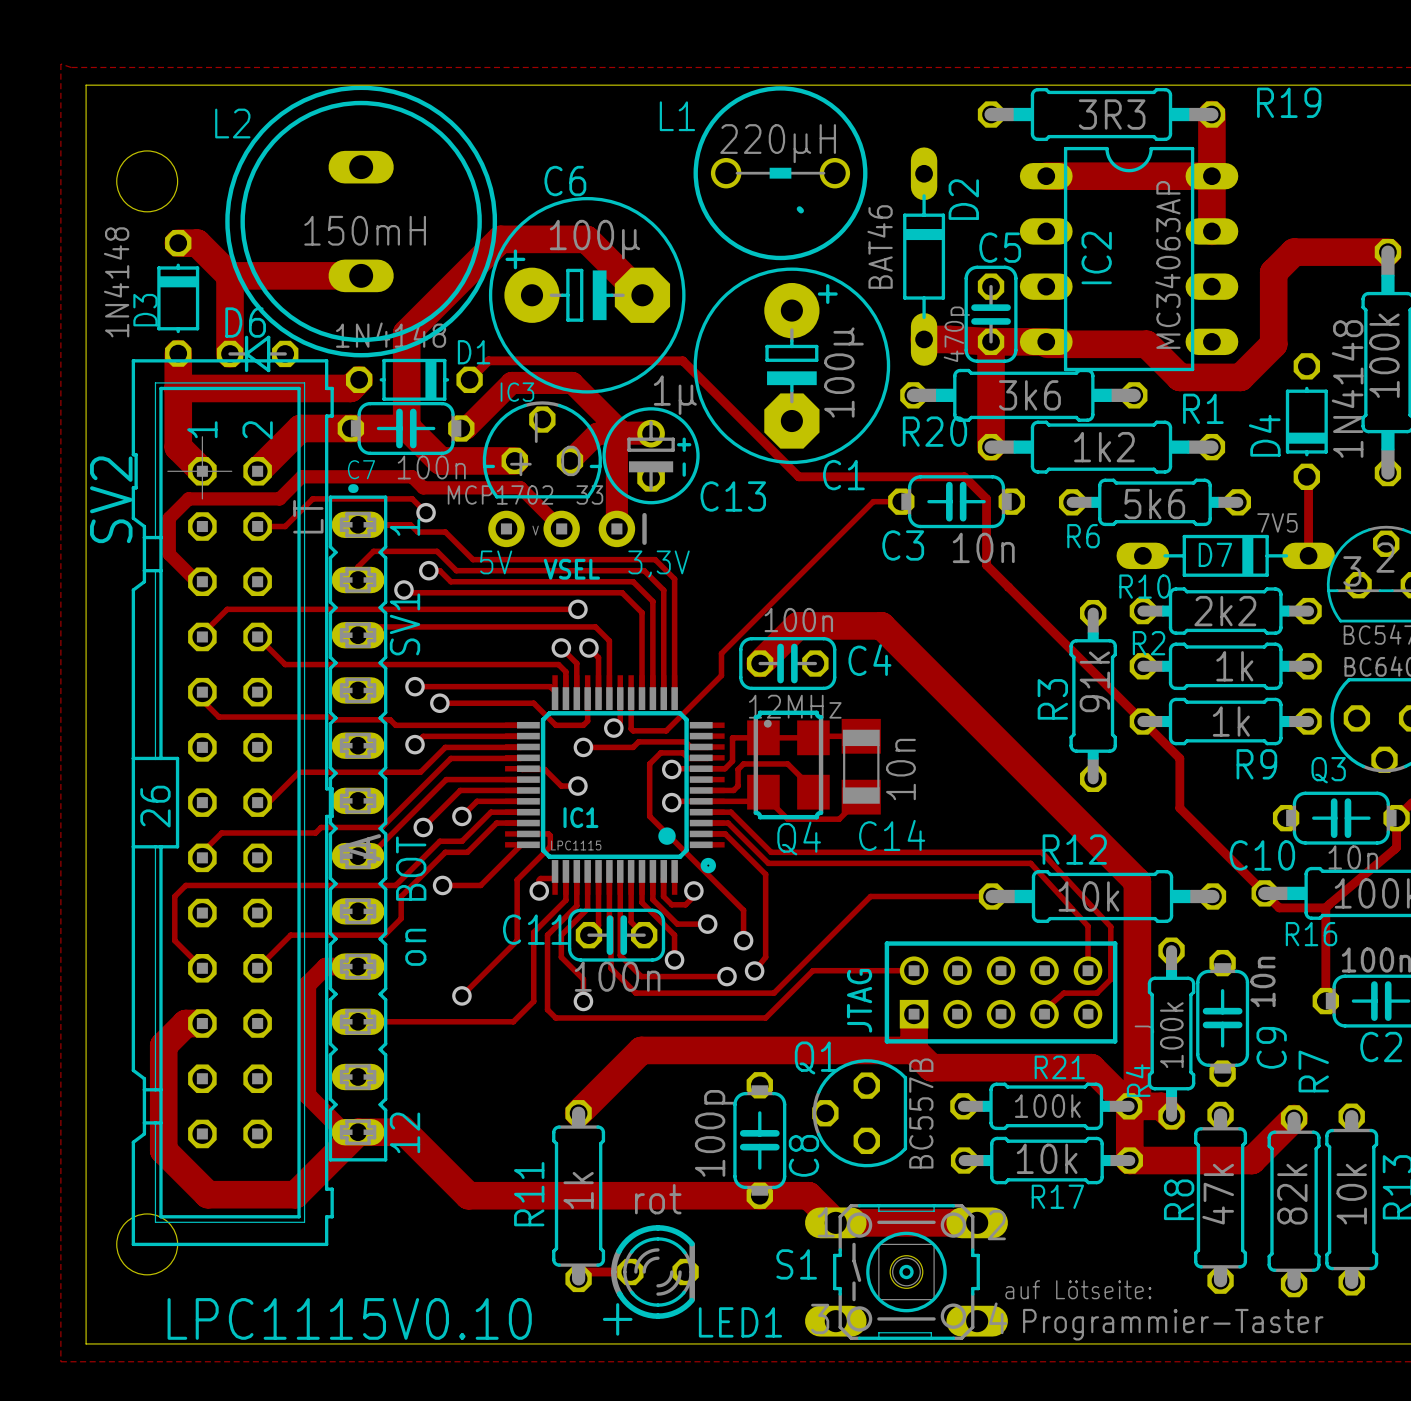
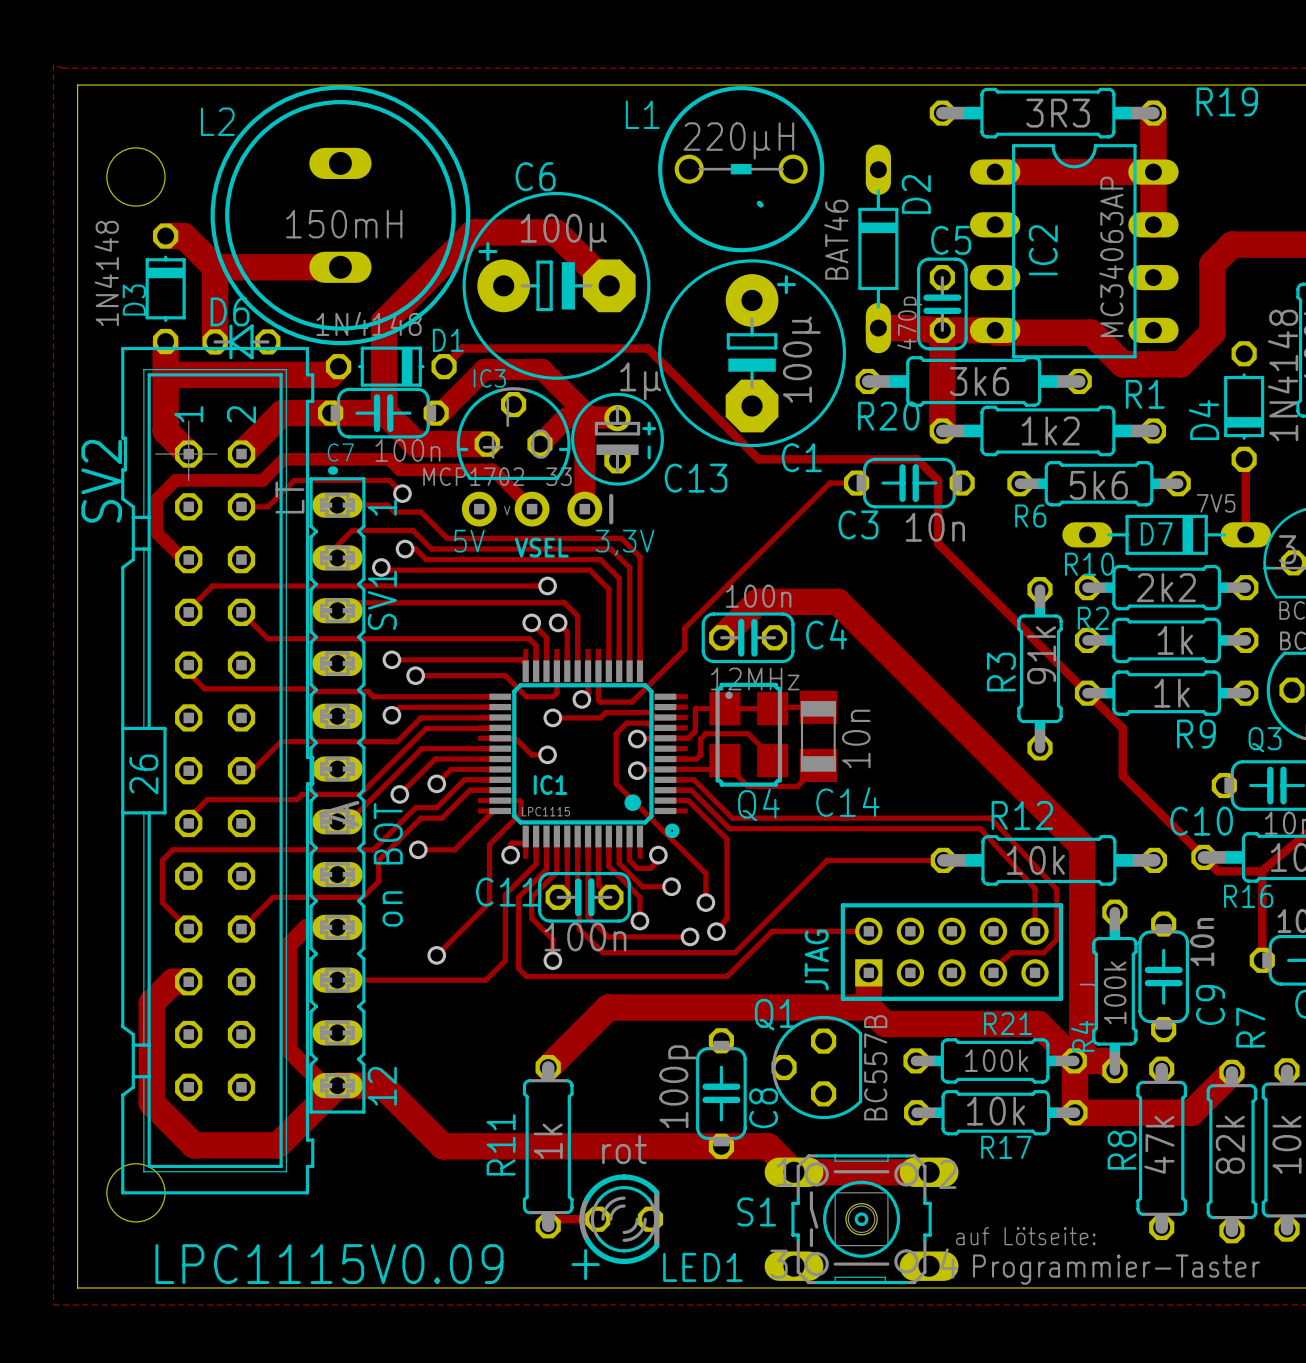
text: LPC1115V0.10 (349, 1318) -> LPC1115V0.09 (329, 1264)

